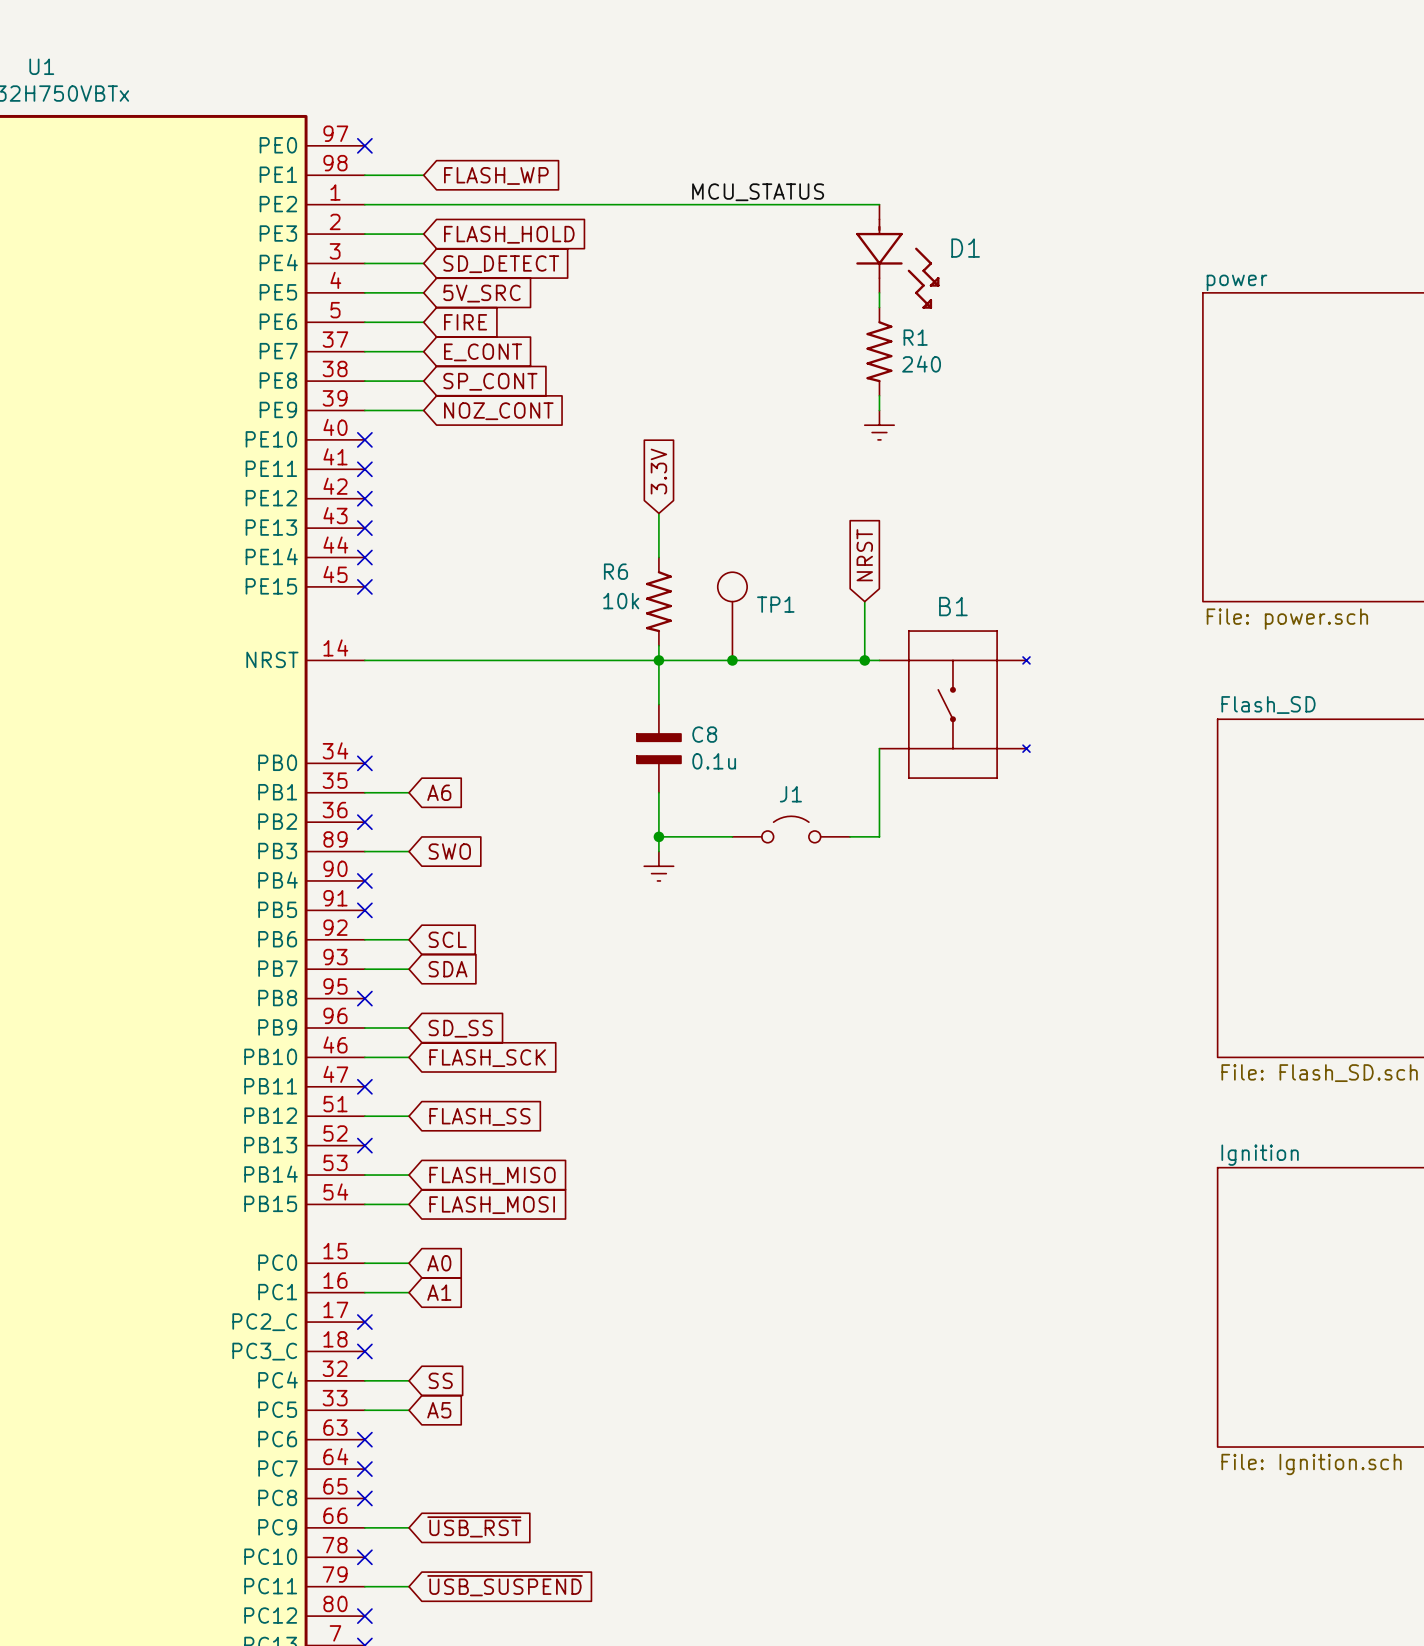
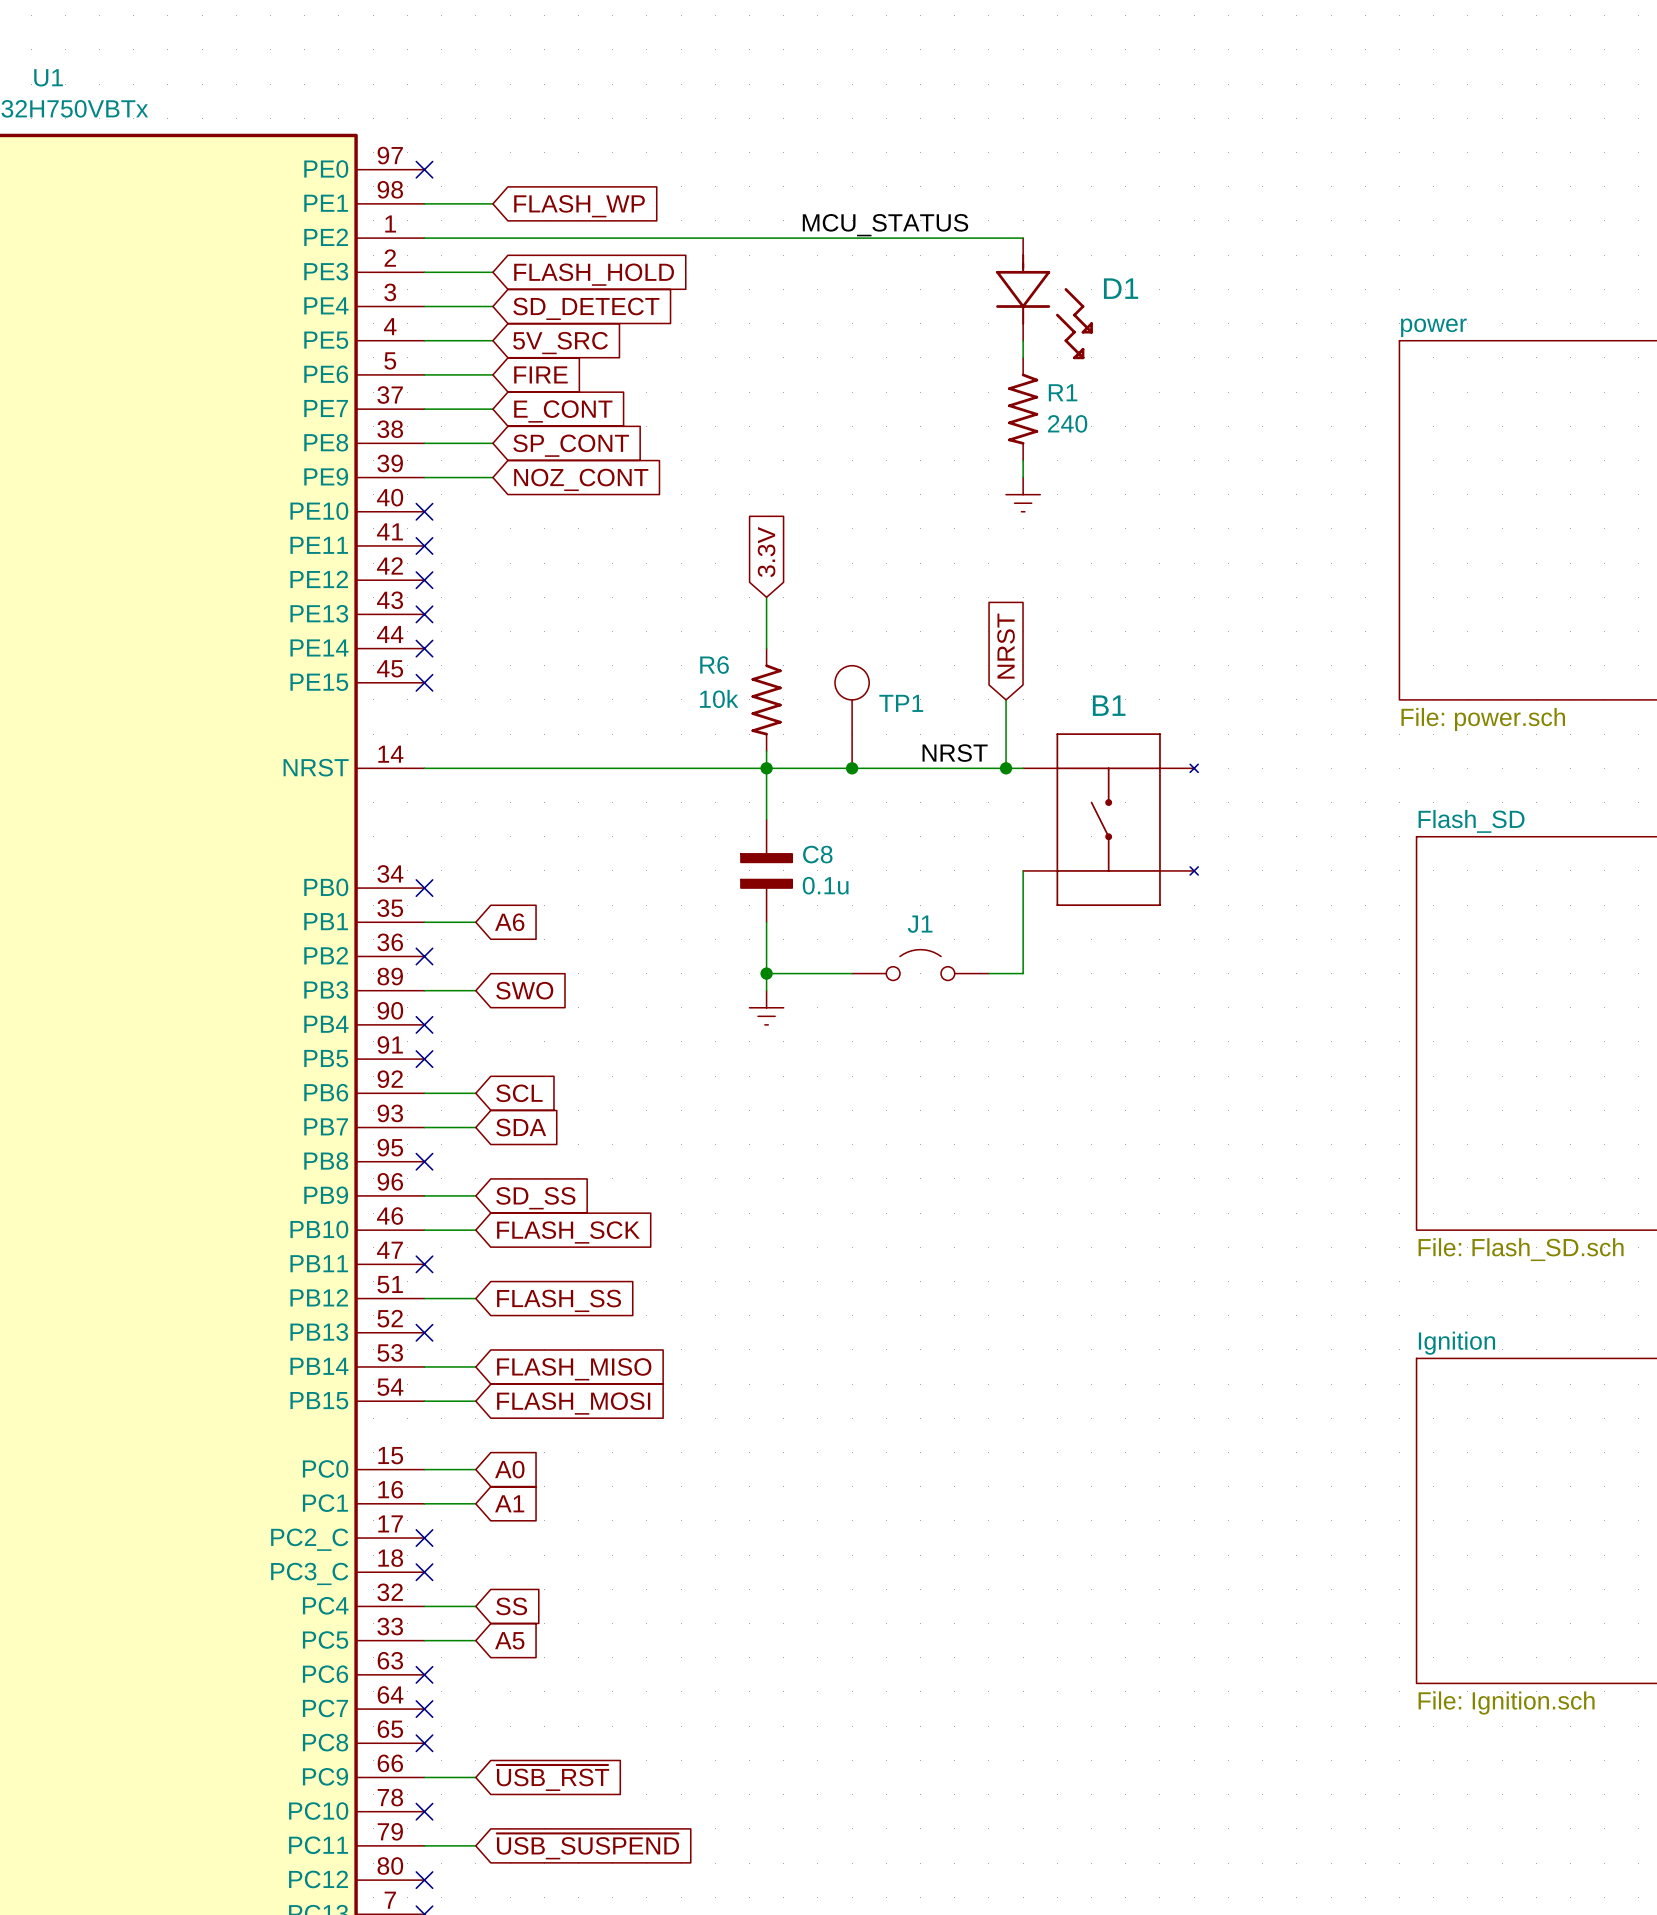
label: none -> NRST (955, 753)

